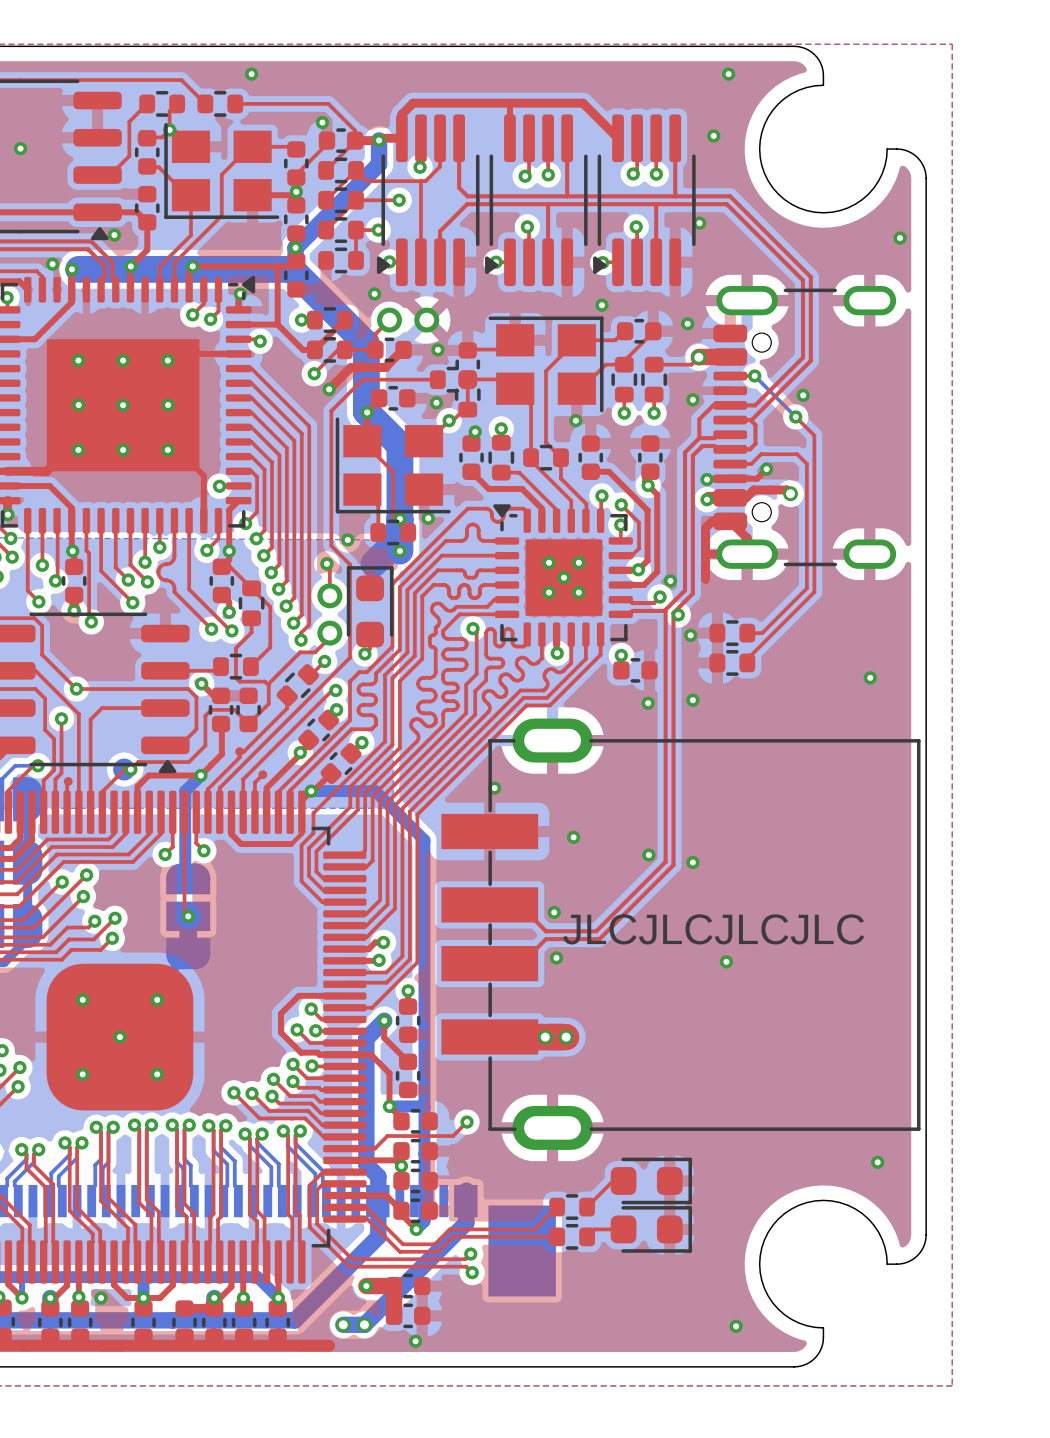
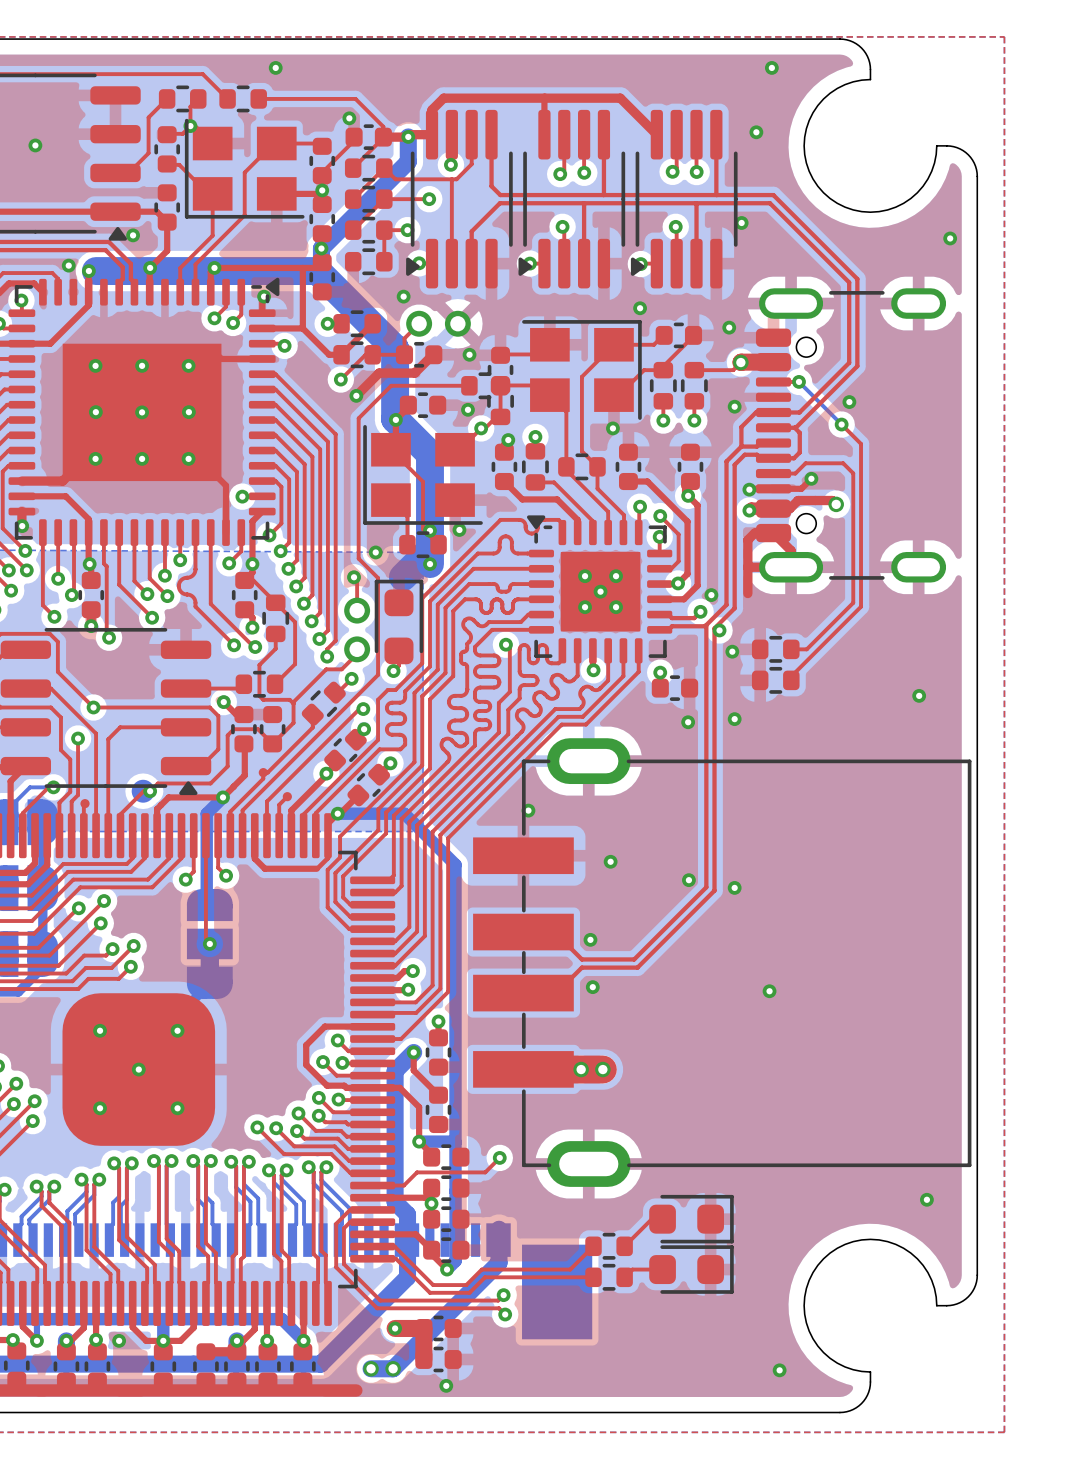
text: JLCJLCJLCJLC (713, 929) -> none

